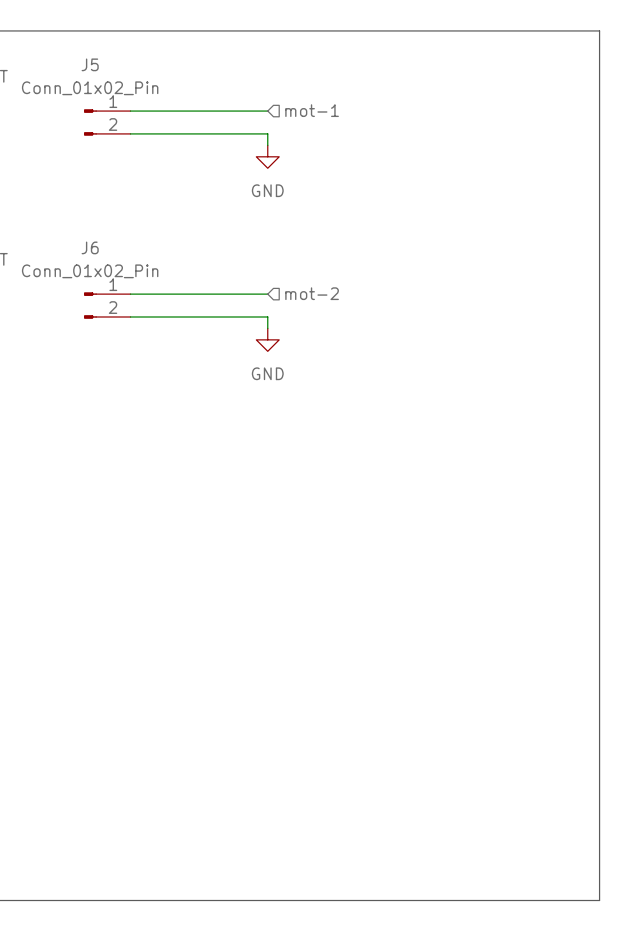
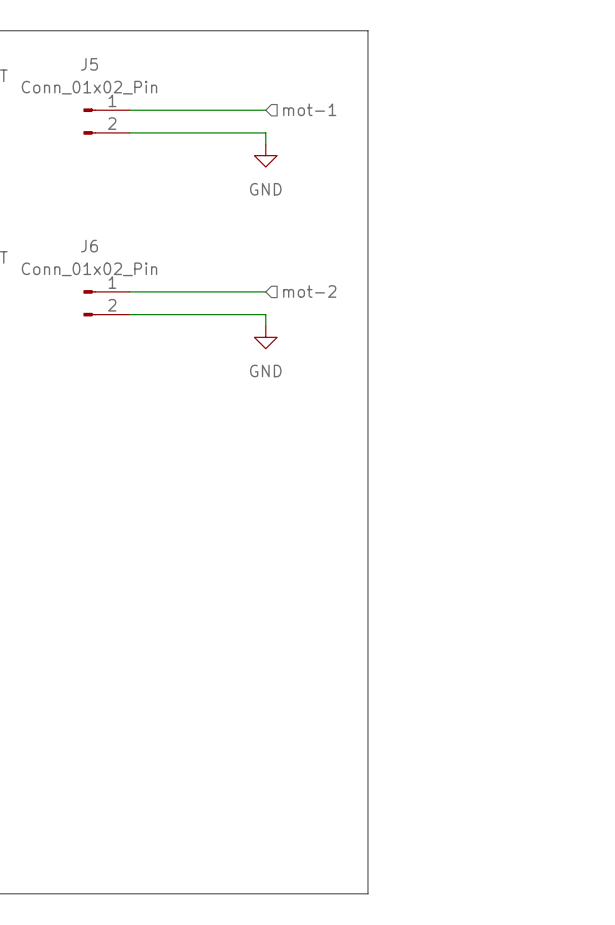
line: (370, 30) (599, 30) (599, 900) (370, 900) -> (367, 30) (367, 893)

